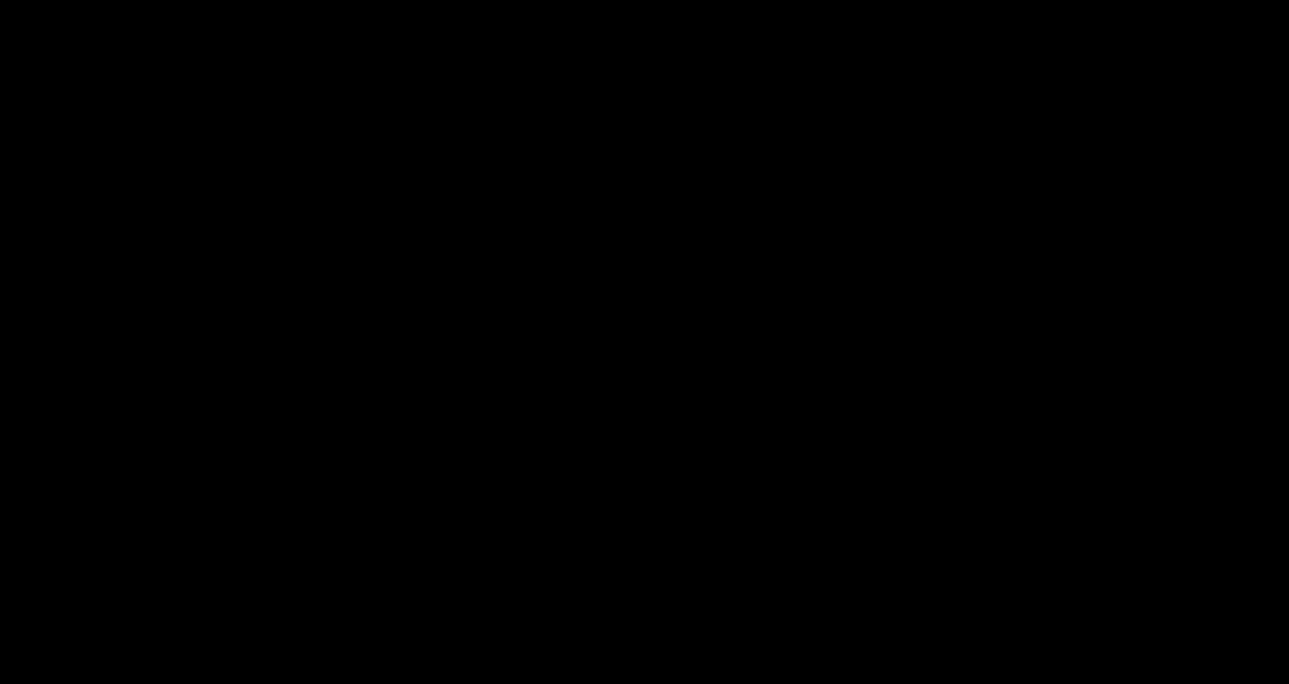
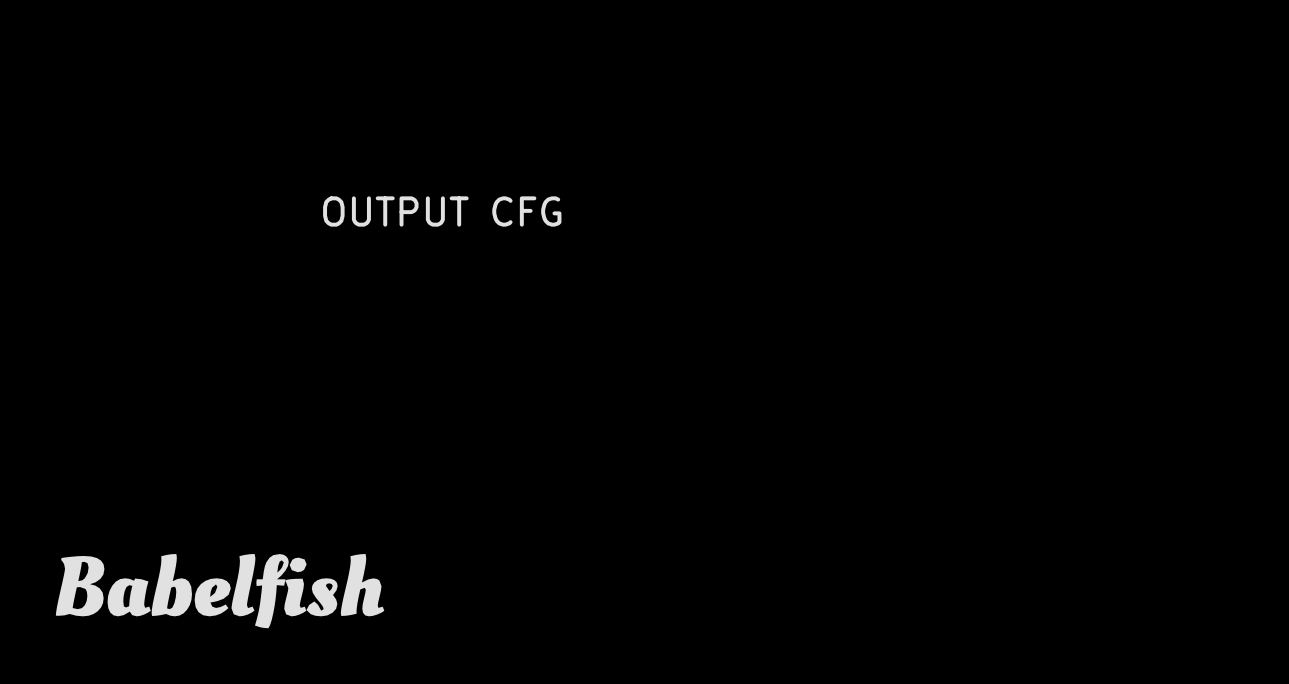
text: none -> OUTPUT CFG (442, 211)
drawing: none -> [55, 553, 385, 629]

